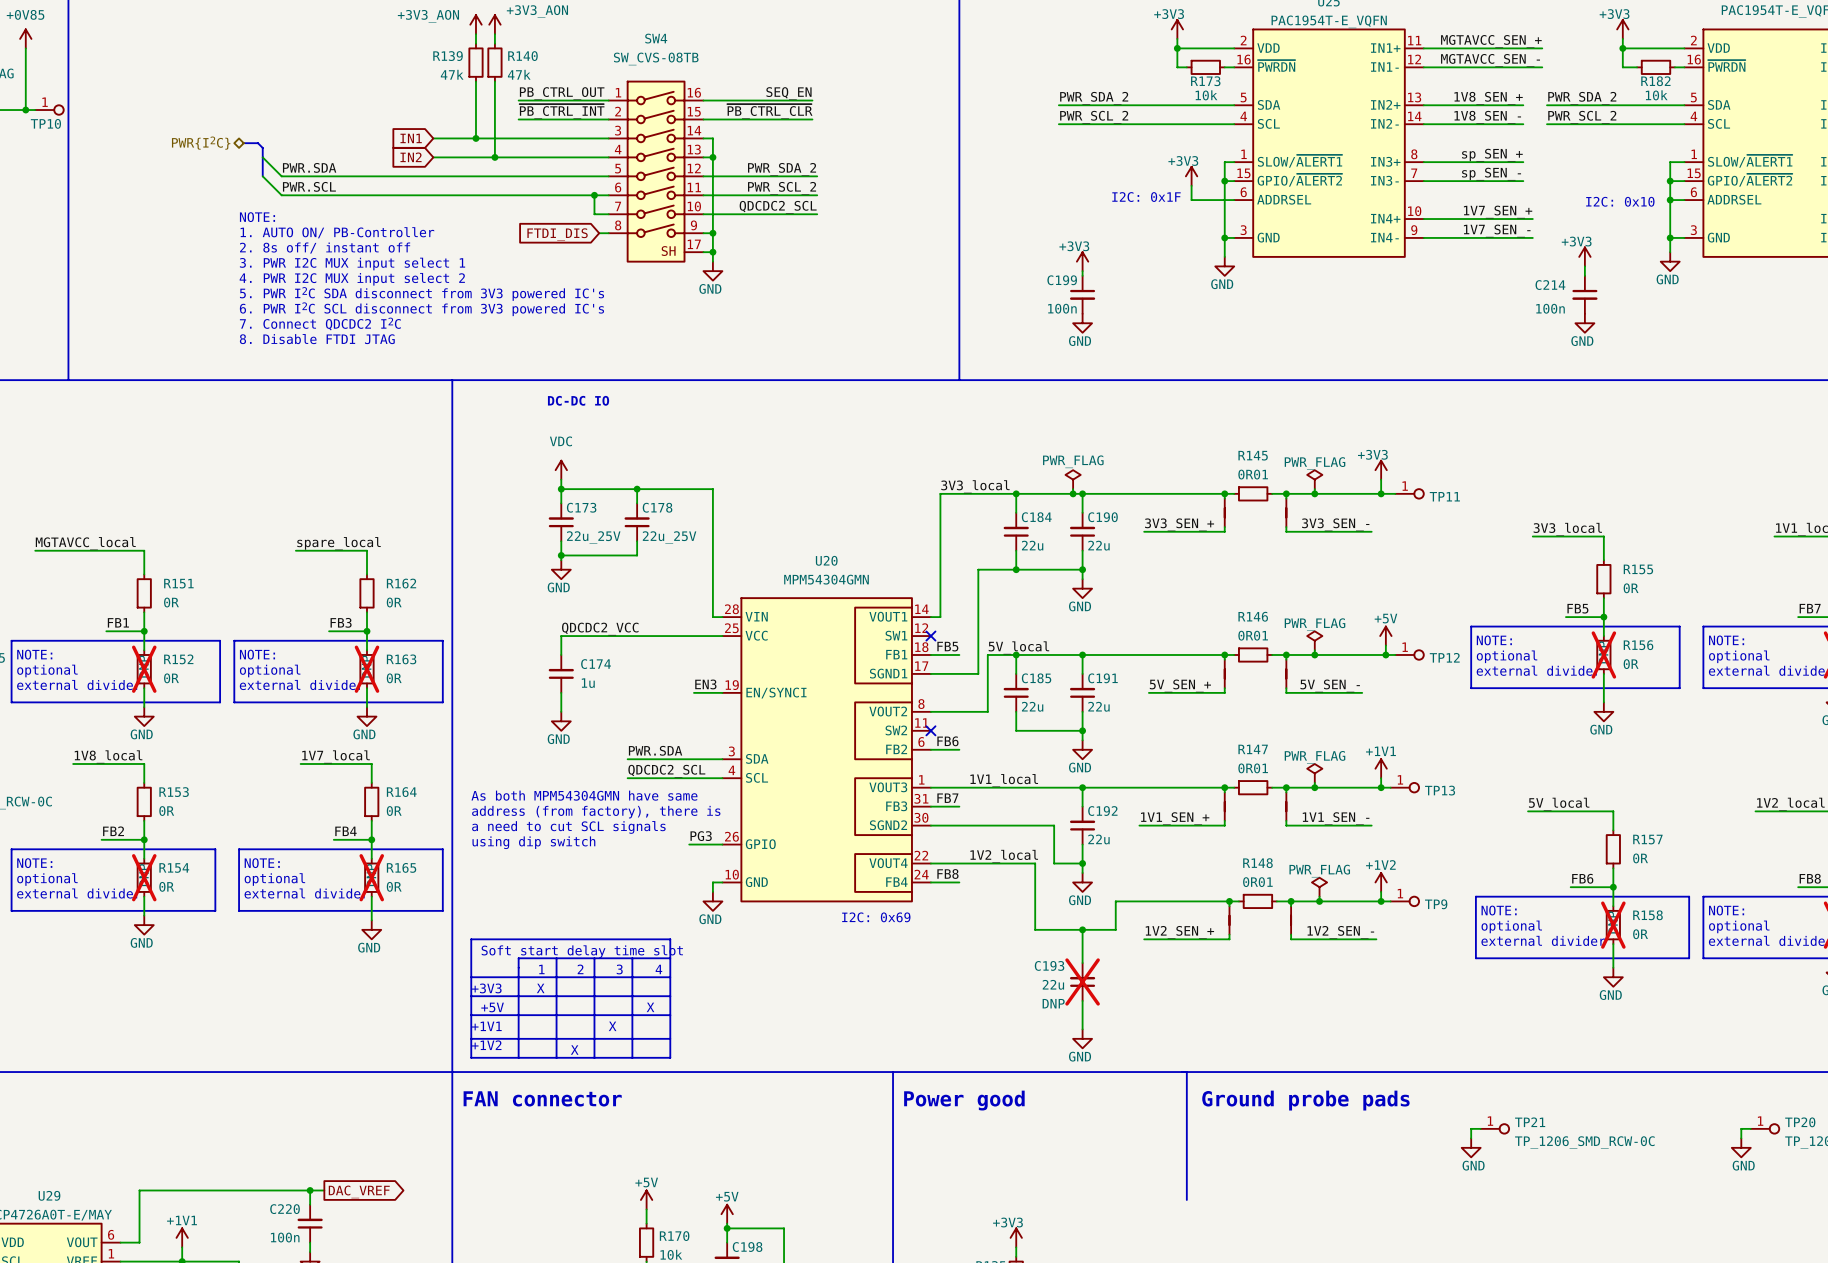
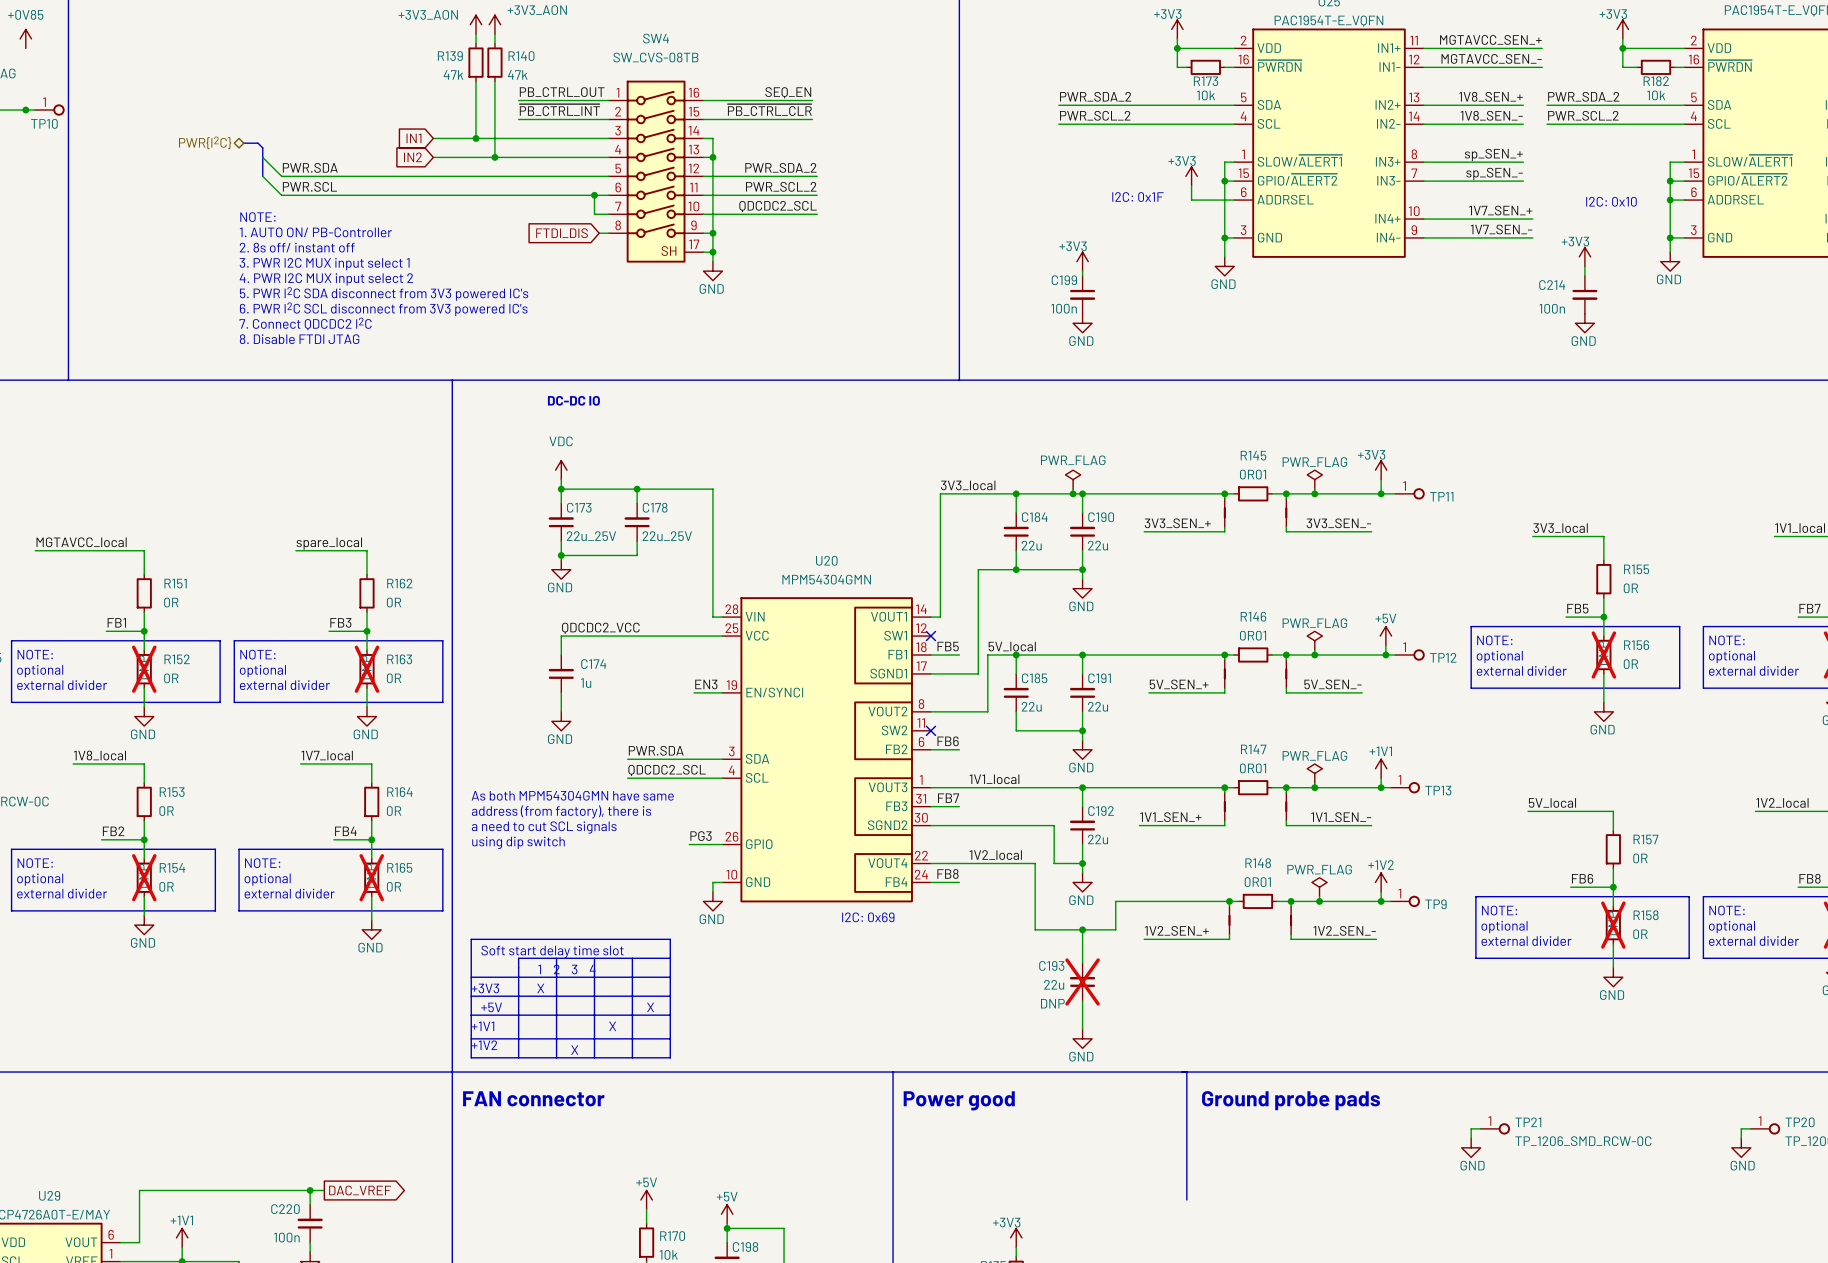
wire: (25, 48) (25, 110) -> none

